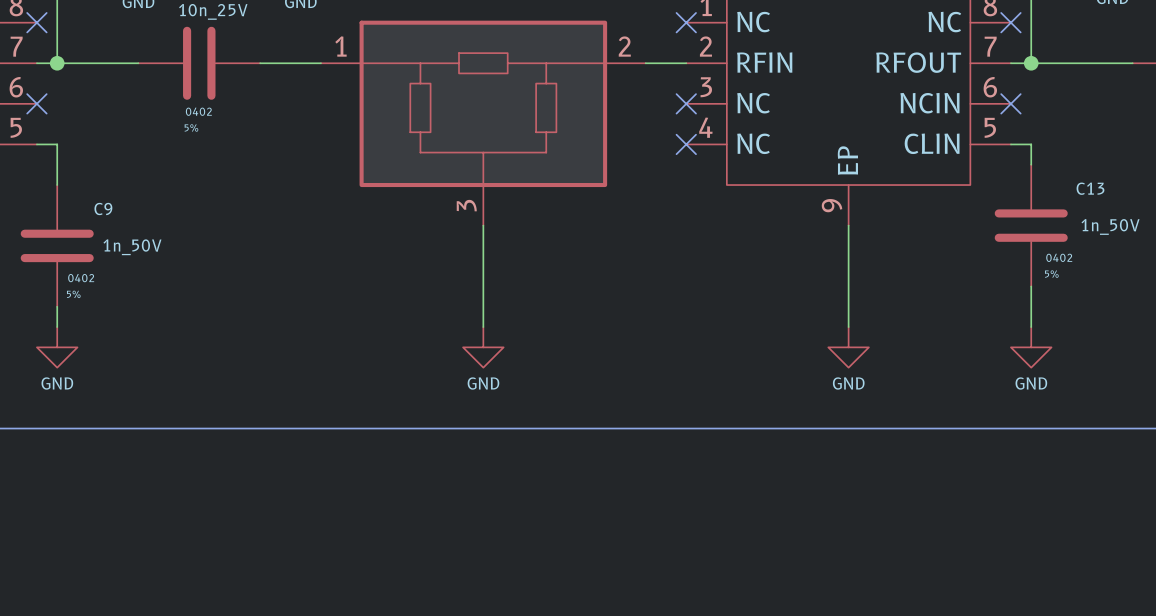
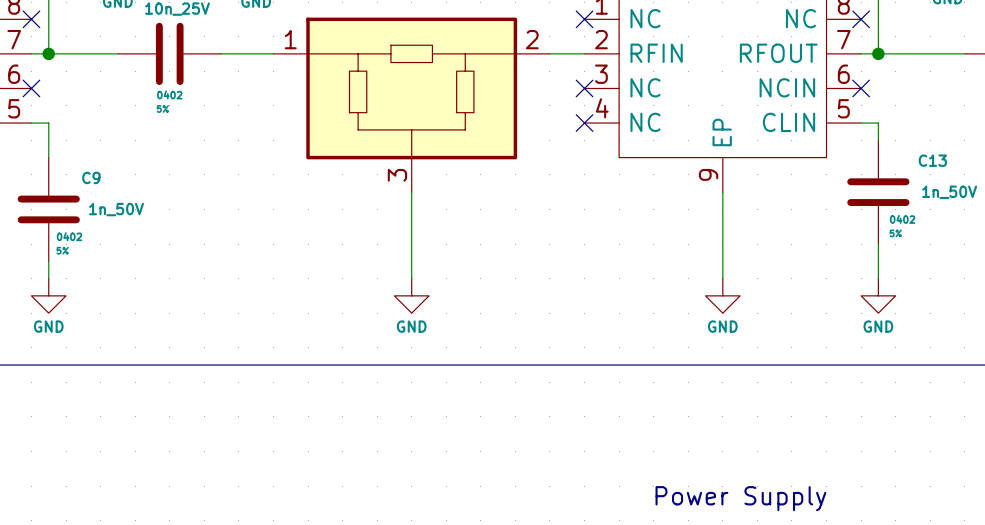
text: none -> Power Supply (740, 498)

